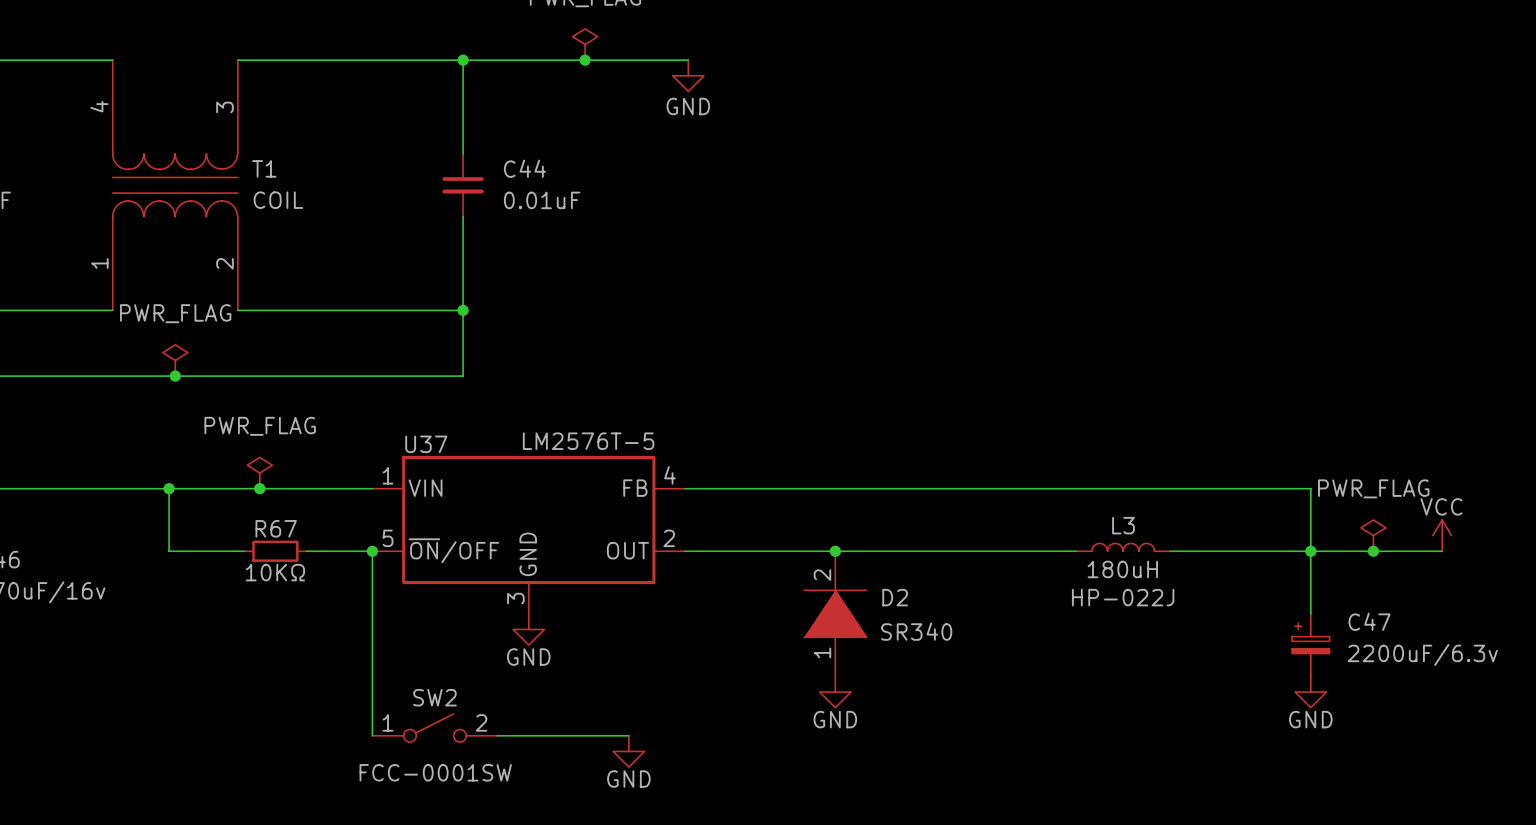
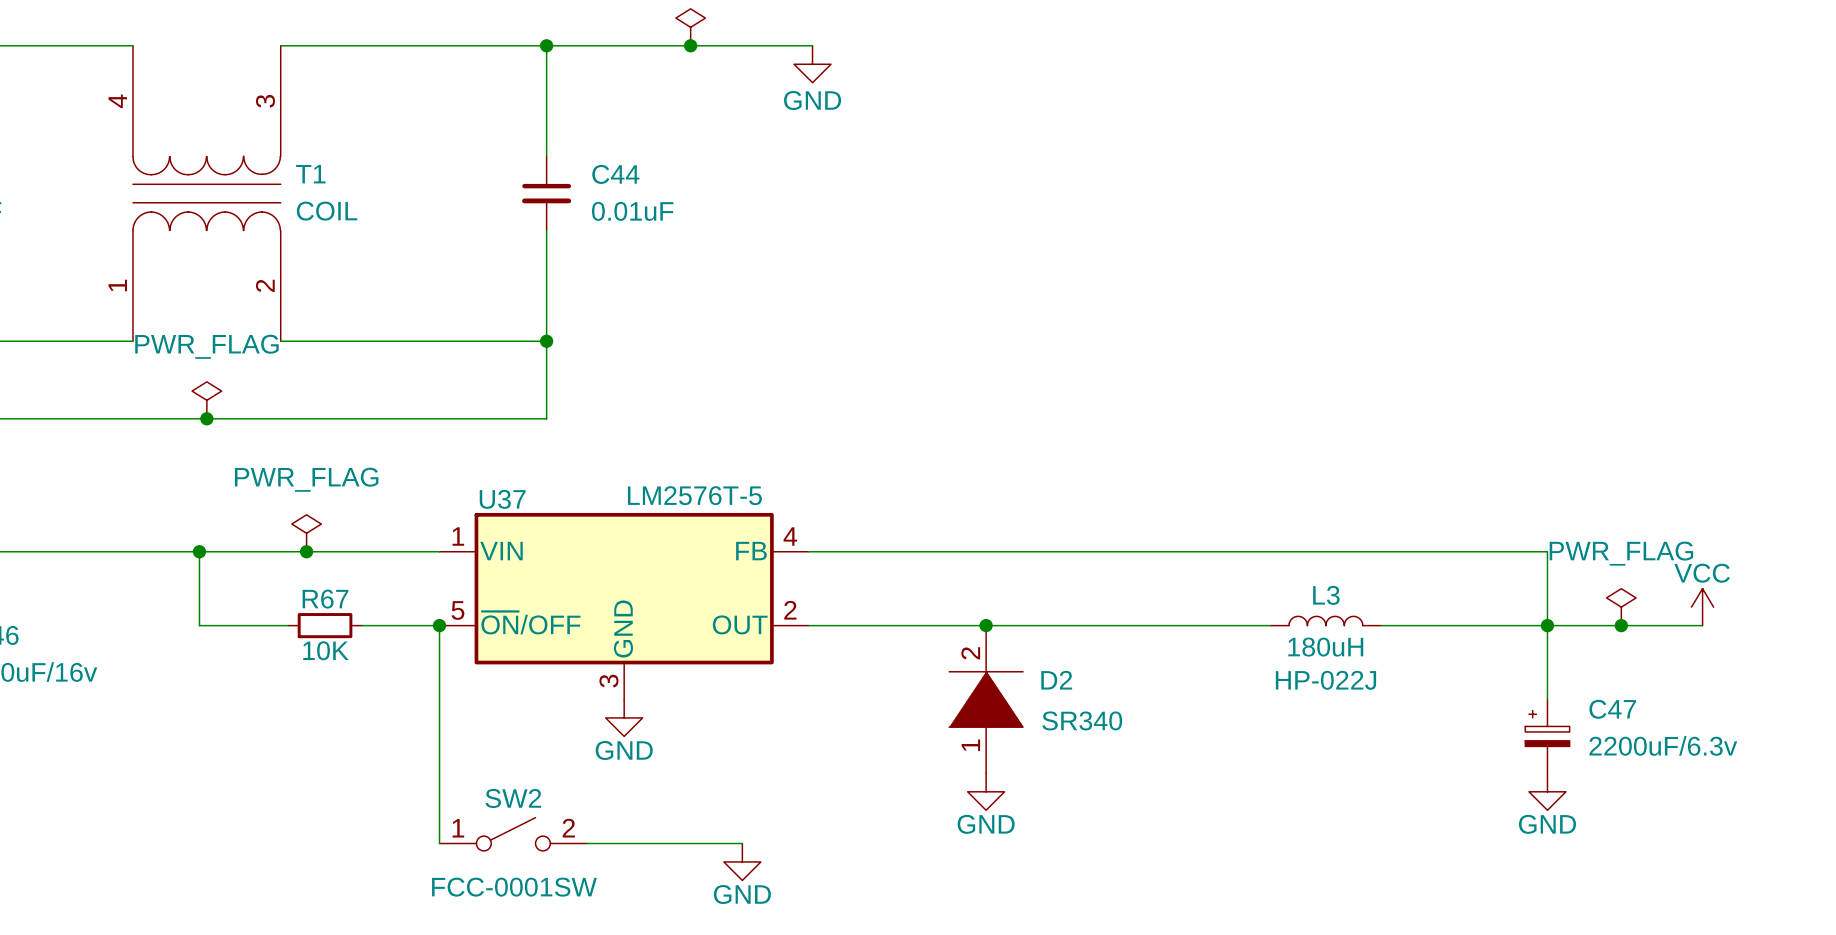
R67 value: 10KΩ (275, 572) -> 10K (325, 650)

